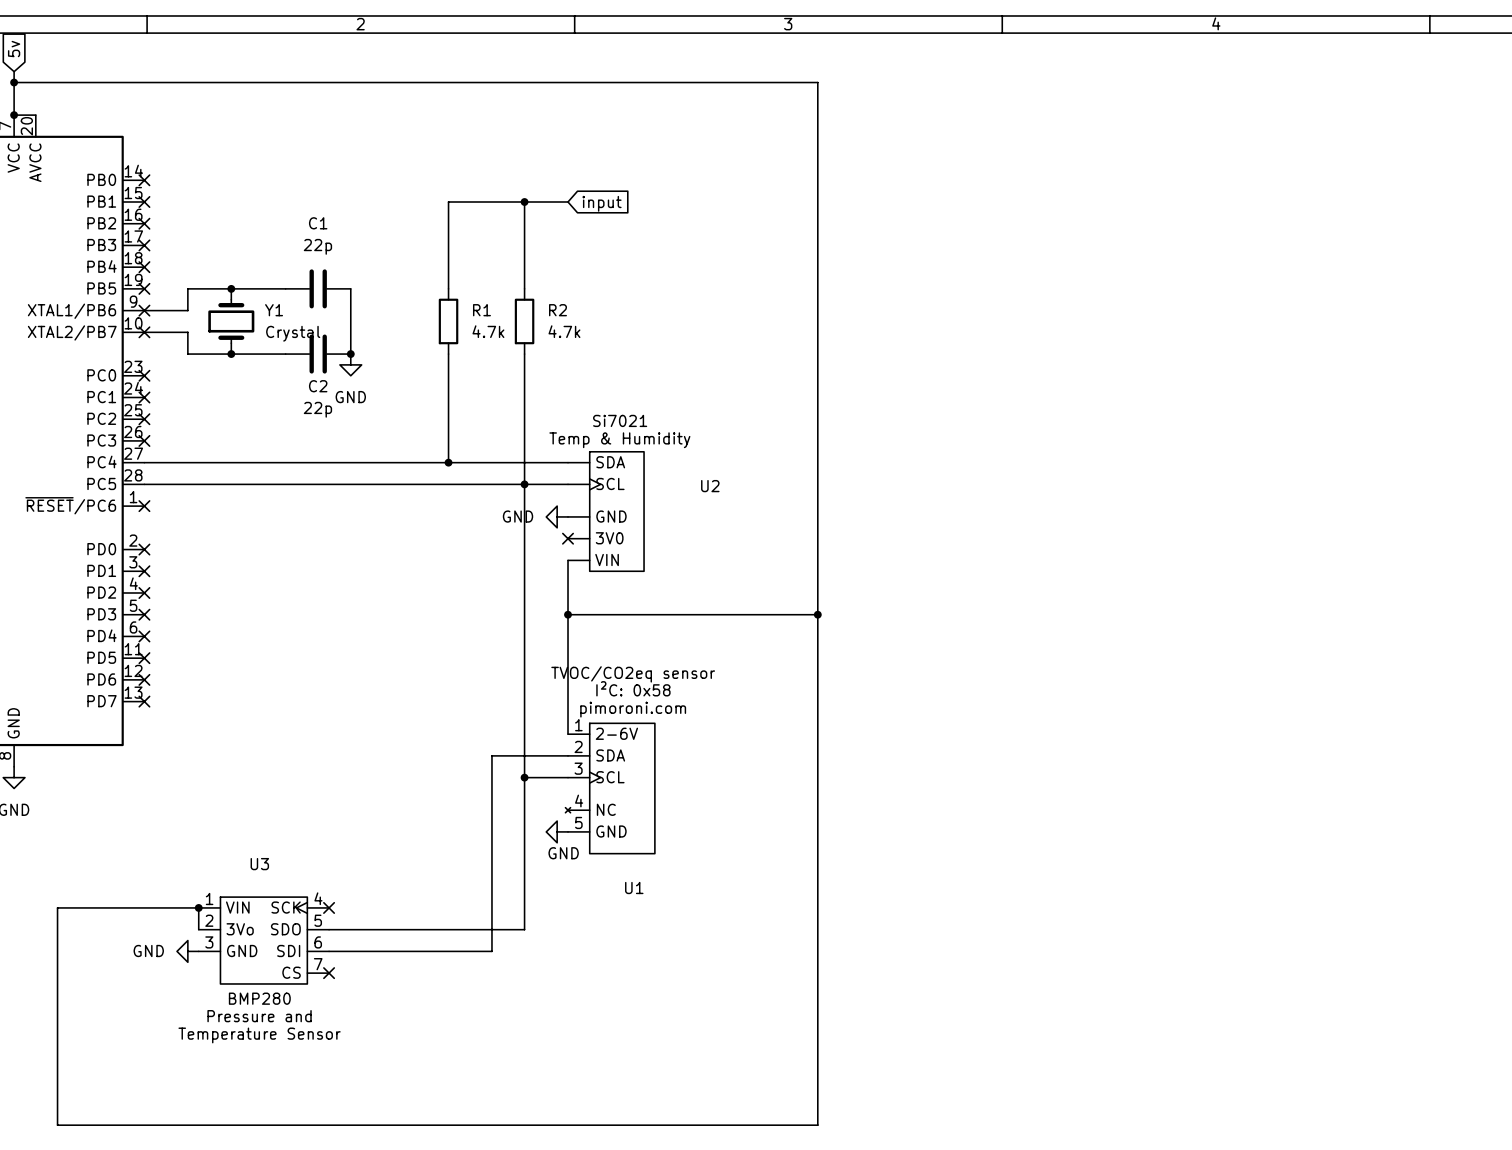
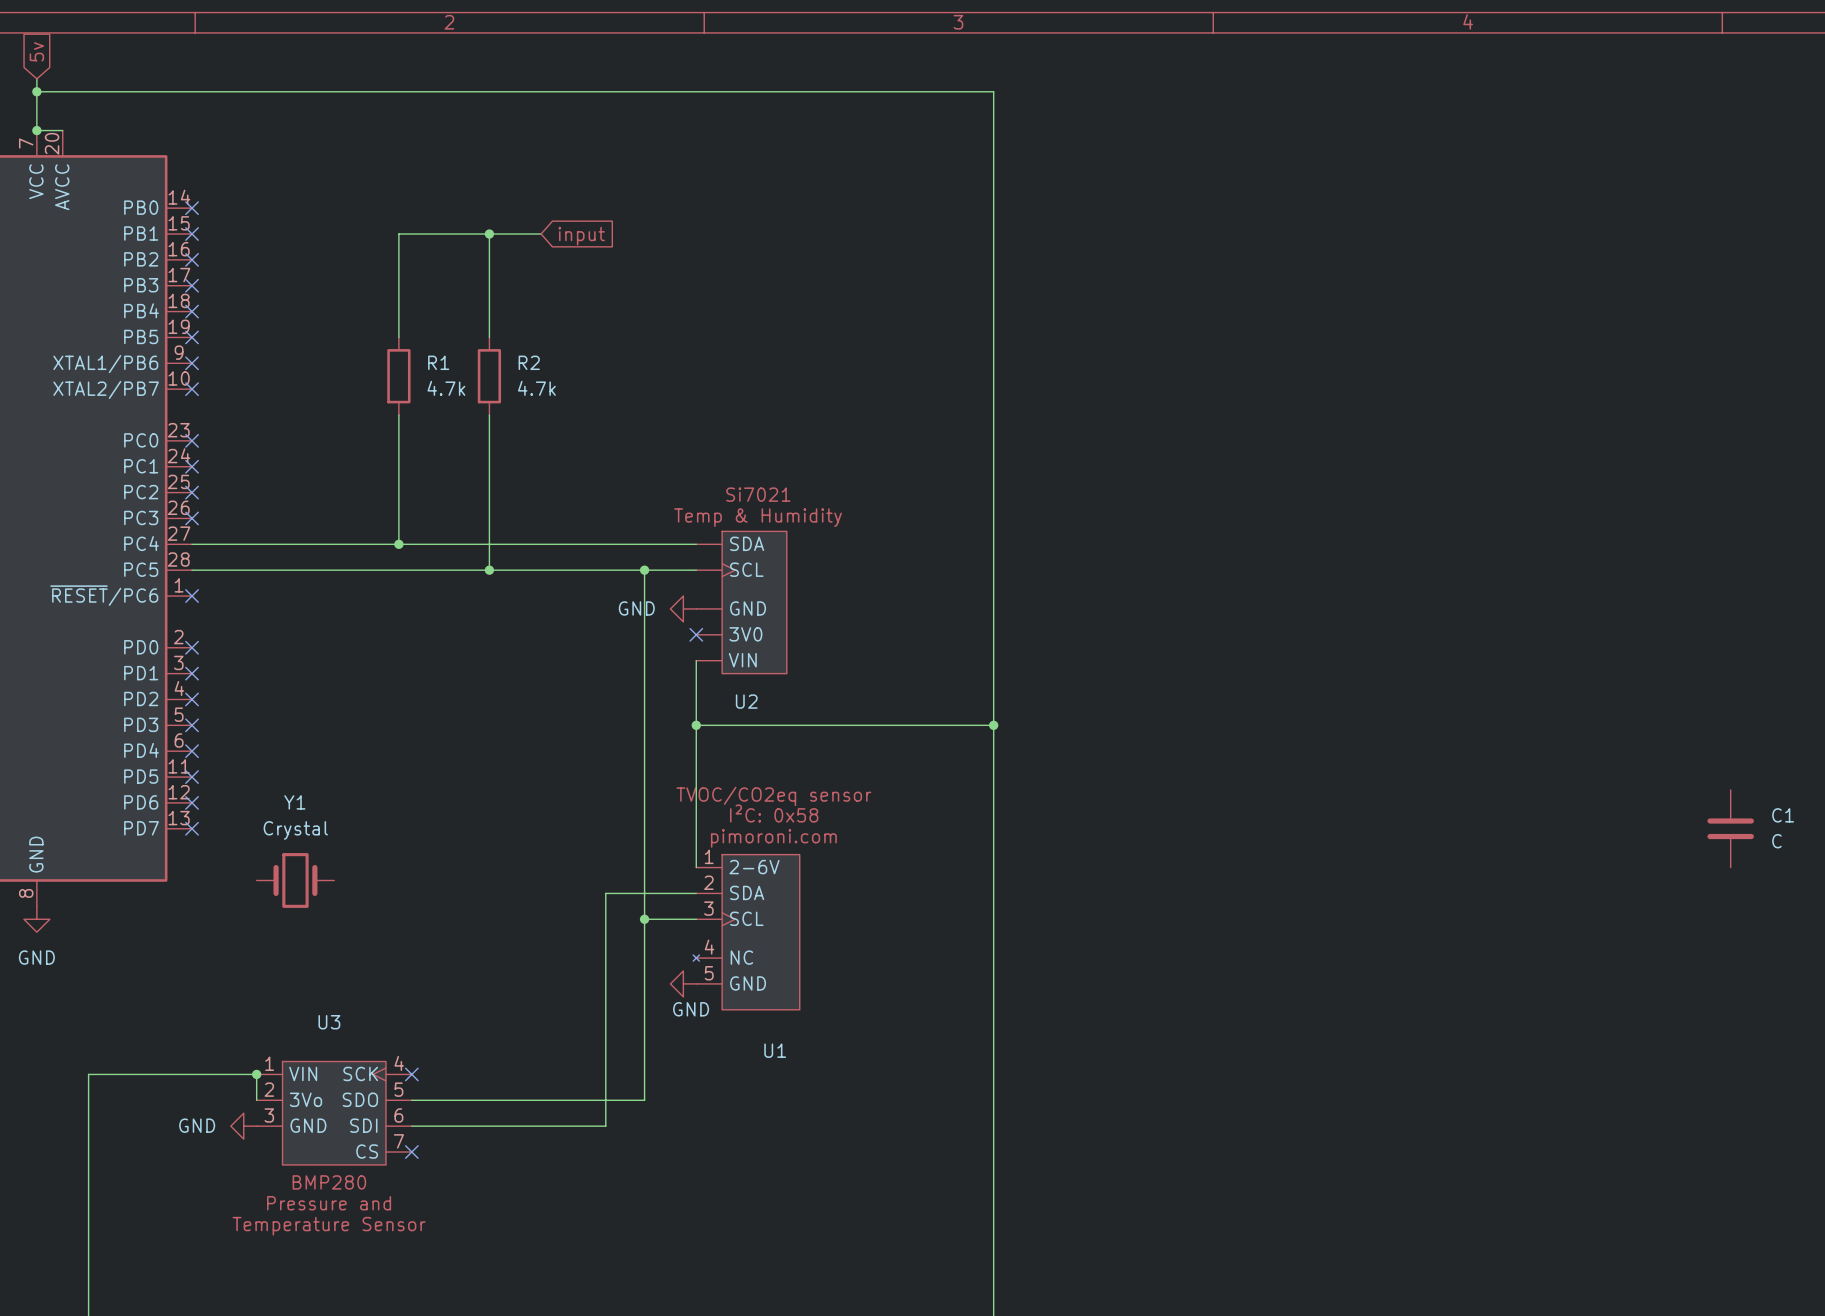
junction: none -> (489, 234)
wire: (524, 202) (524, 288) -> (489, 234) (489, 337)
junction: (524, 202) -> none
wire: (568, 202) (448, 202) (448, 288) -> (541, 234) (398, 234) (398, 337)
global label position: input (602, 203) -> input (581, 236)
C1 name position: C1 (318, 223) -> C1 (1783, 815)
C1 value: 22p (317, 246) -> C (1776, 841)
junction: (231, 288) -> none
wire: (285, 288) (187, 288) (187, 310) (144, 310) -> none
C1 rotation: 0° (318, 288) -> 90° clockwise (1730, 828)
C1 position: (318, 288) -> (1730, 828)
wire: (350, 288) (350, 354) -> none
Y1 name position: Y1 (274, 310) -> Y1 (294, 802)
Y1 rotation: 0° (231, 321) -> 90° clockwise (295, 880)
Y1 position: (231, 321) -> (295, 880)
R1 position: (448, 321) -> (398, 376)
R2 position: (524, 321) -> (489, 376)
wire: (144, 332) (187, 332) (187, 354) (285, 354) -> none
Y1 value position: Crystal (293, 333) -> Crystal (295, 830)
junction: (231, 354) -> none
C2: 22p (318, 354) -> none
junction: (350, 354) -> none
wire: (448, 354) (448, 462) -> (398, 415) (398, 544)
wire: (524, 354) (524, 484) -> (489, 415) (489, 570)
power symbol: GND (350, 364) -> none
junction: none -> (398, 544)
junction: (448, 462) -> none
junction: none -> (489, 570)
U2 name position: U2 (710, 486) -> U2 (746, 701)

